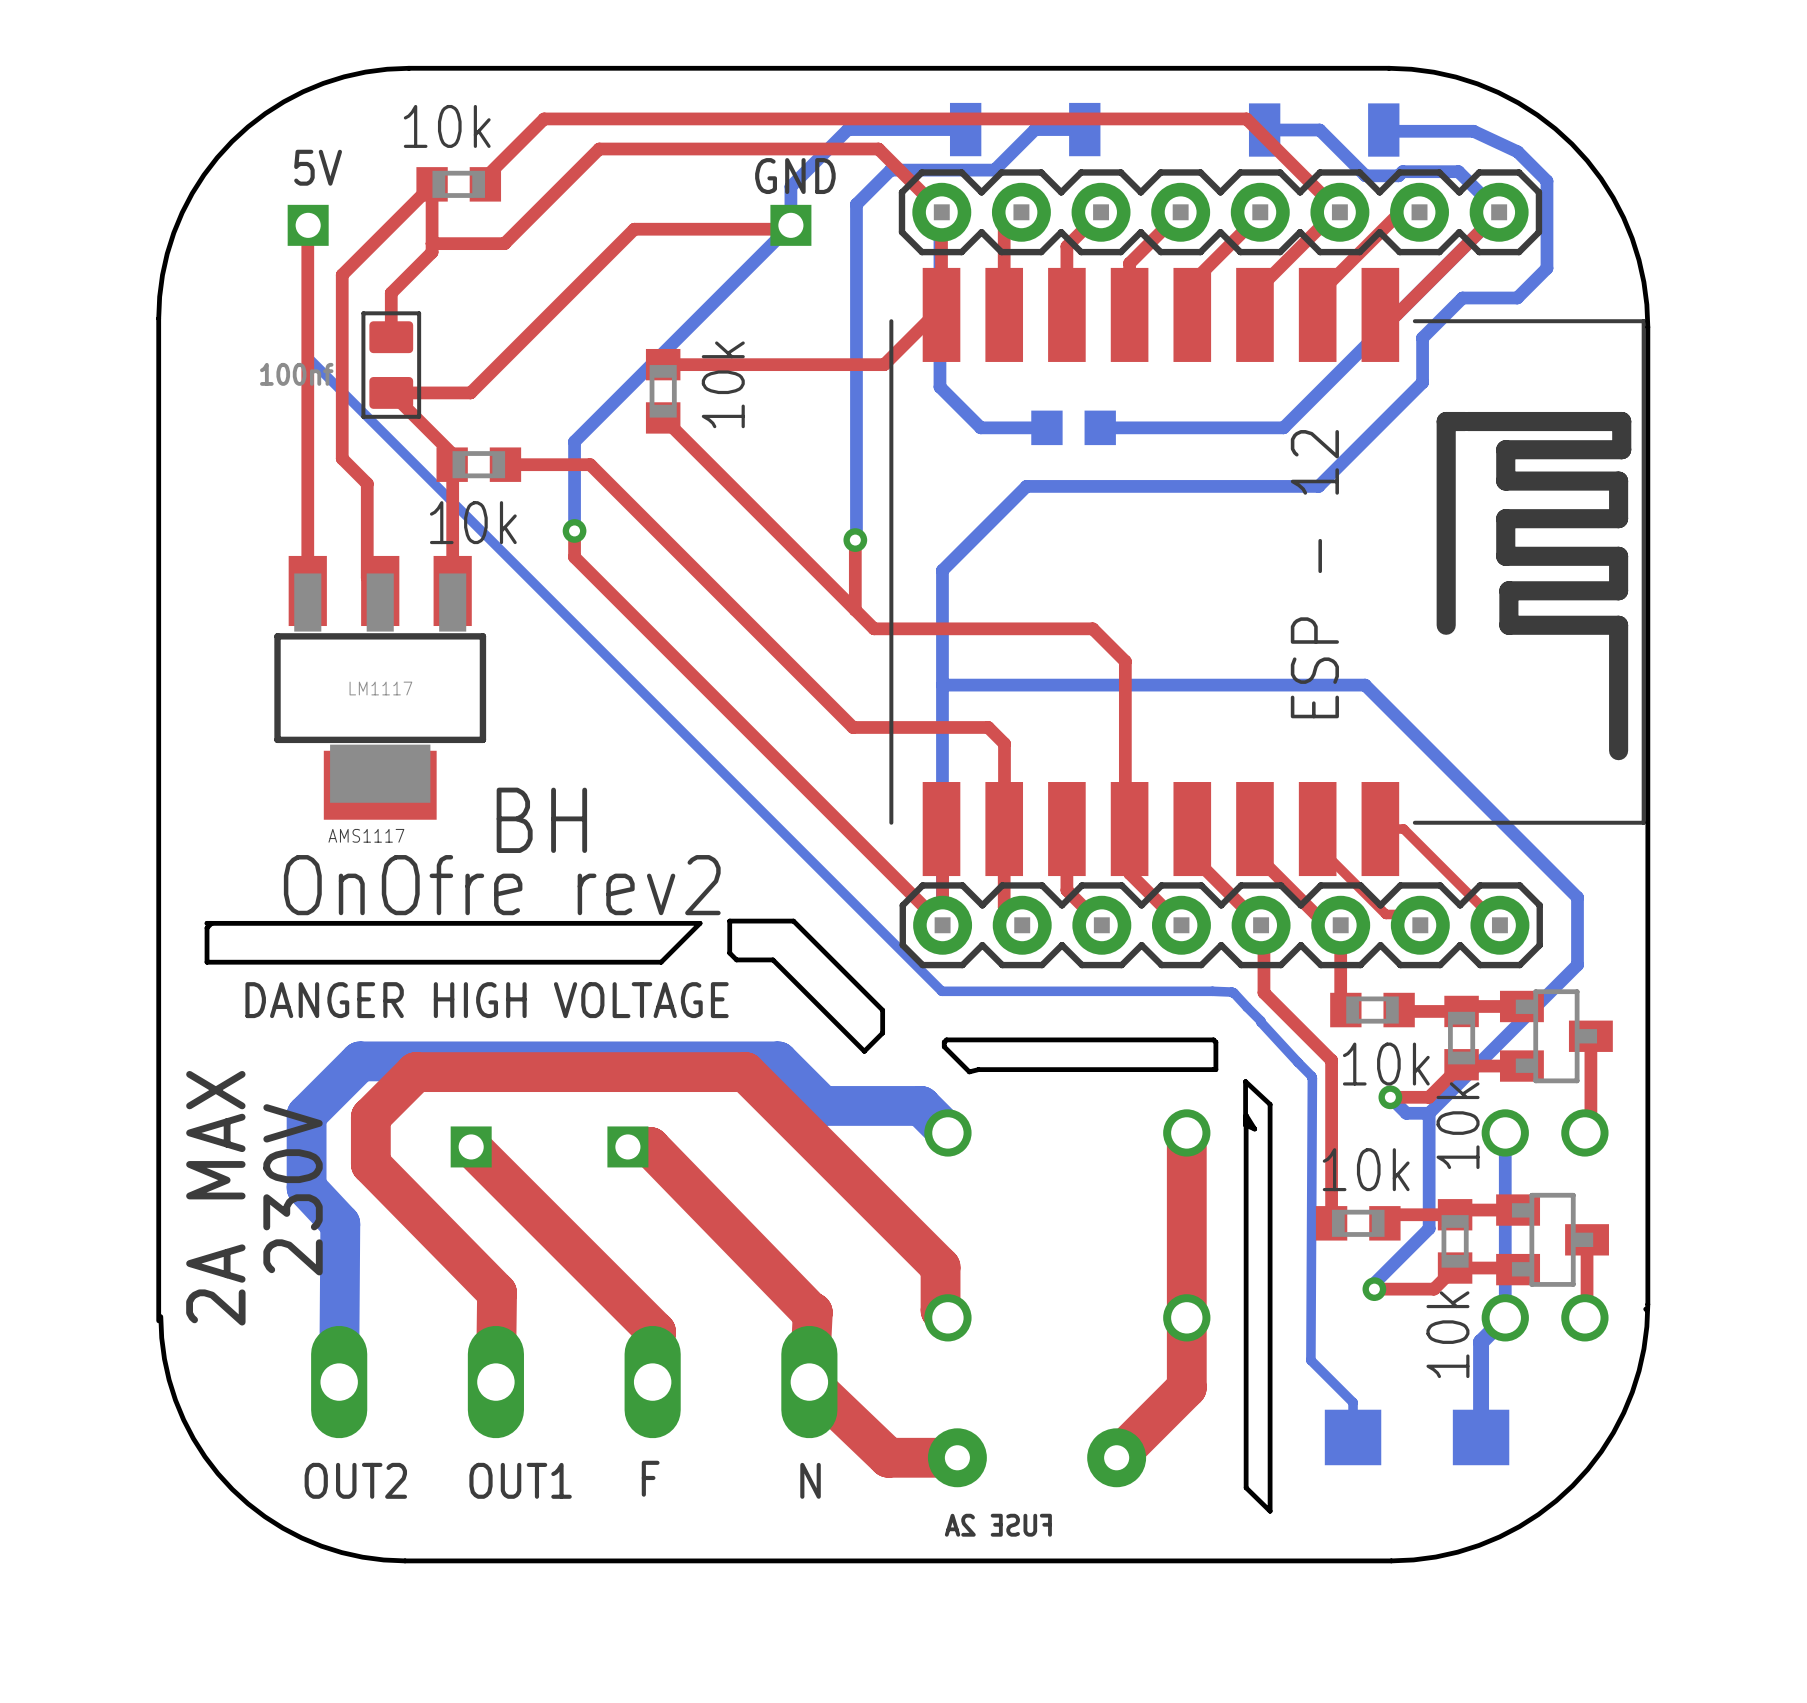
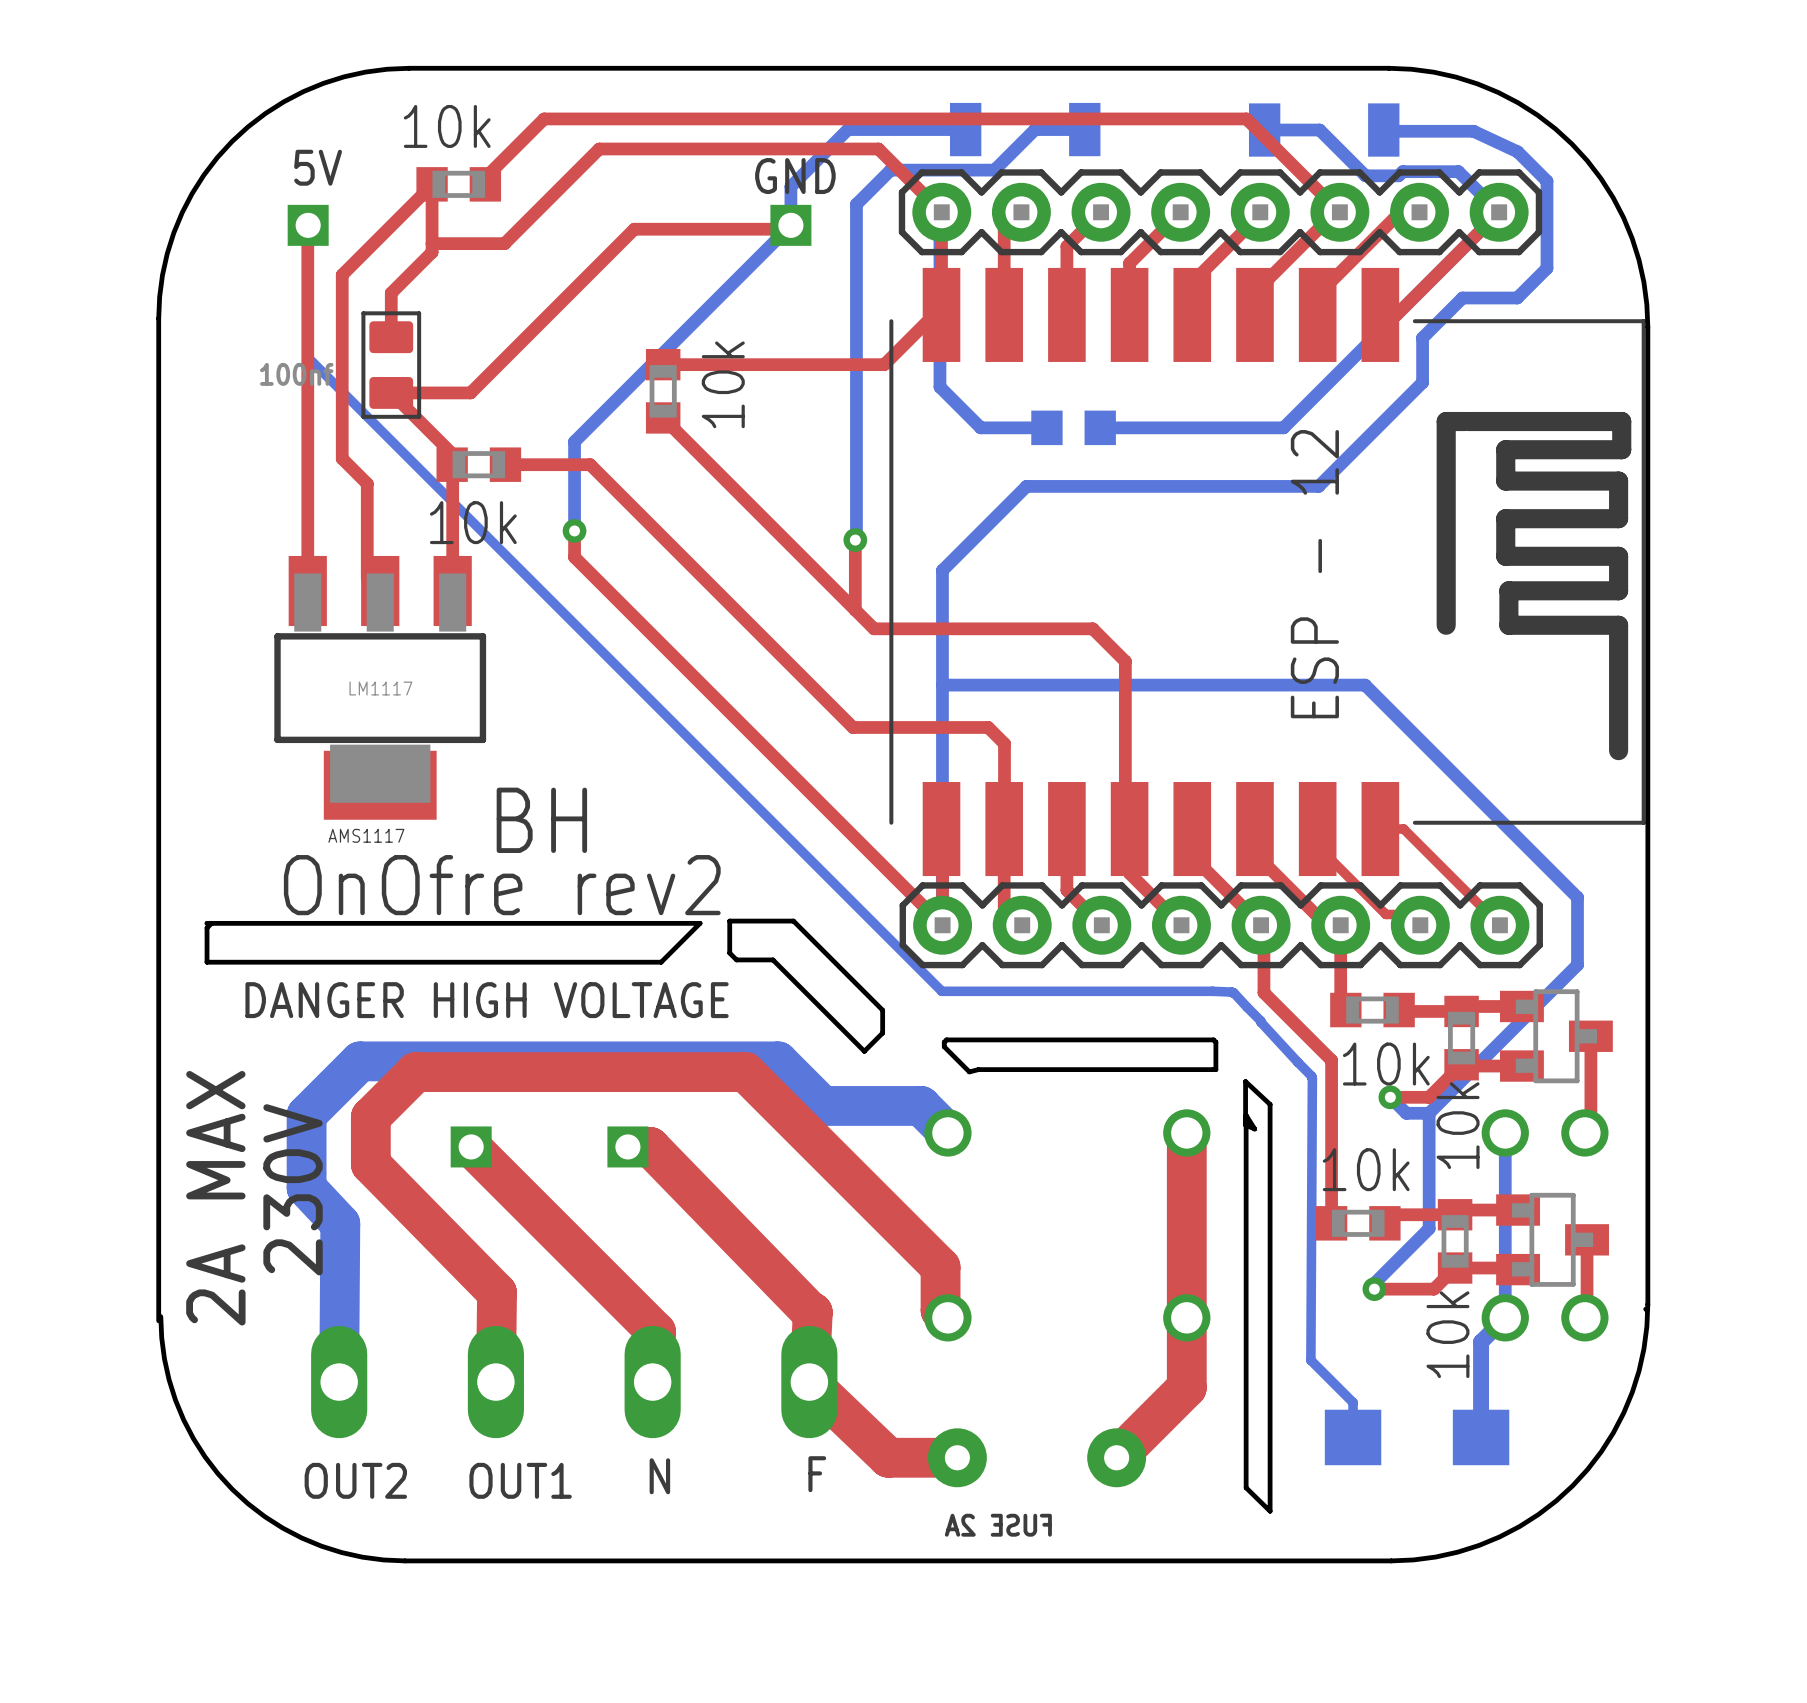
text position: F (650, 1478) -> F (817, 1474)
text position: N (810, 1480) -> N (659, 1476)

